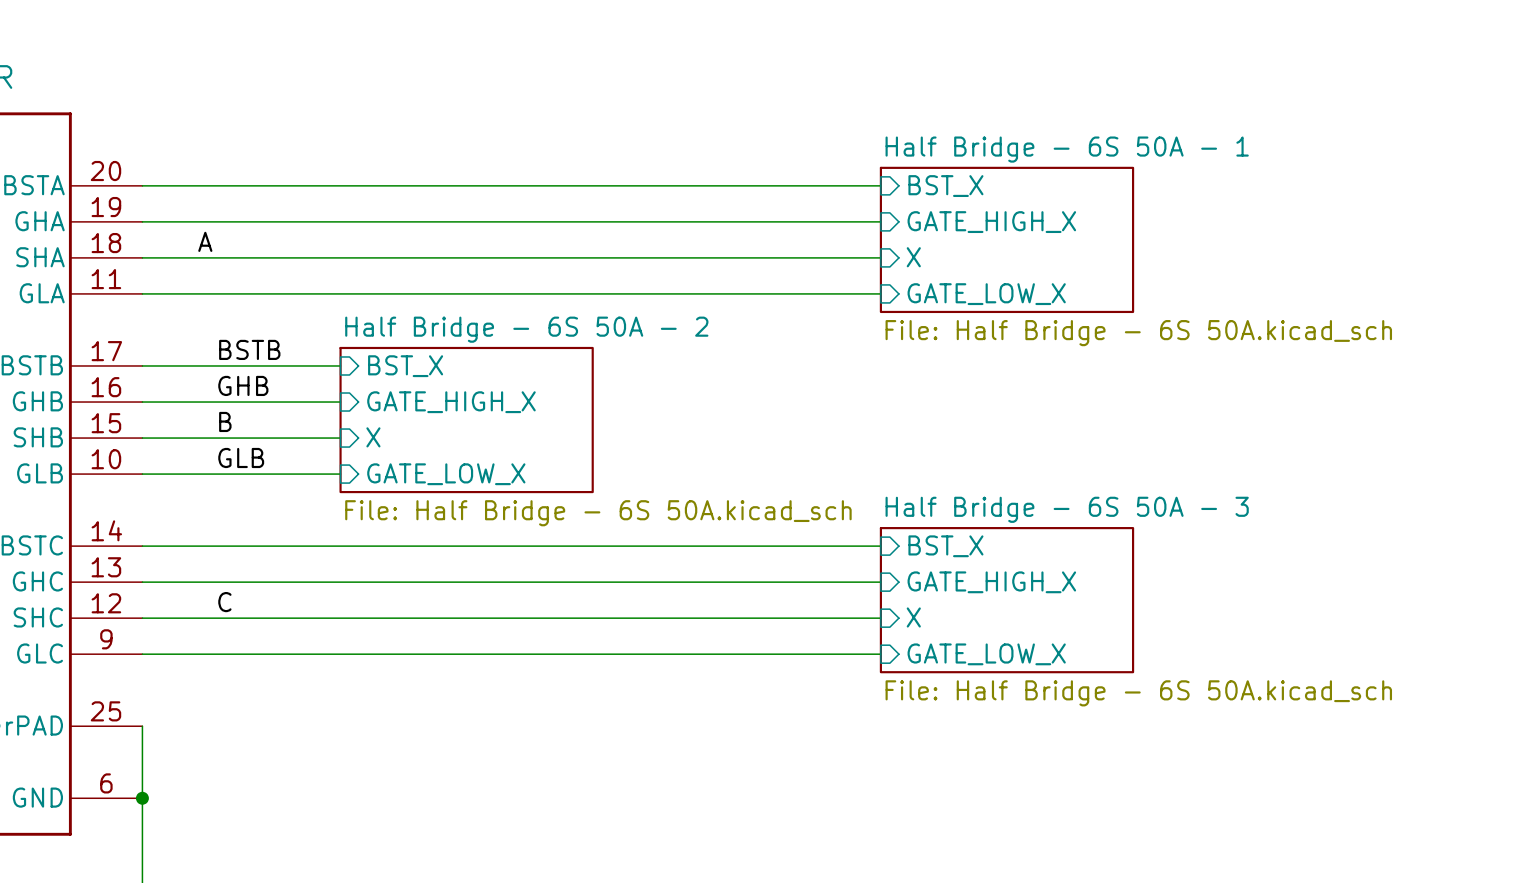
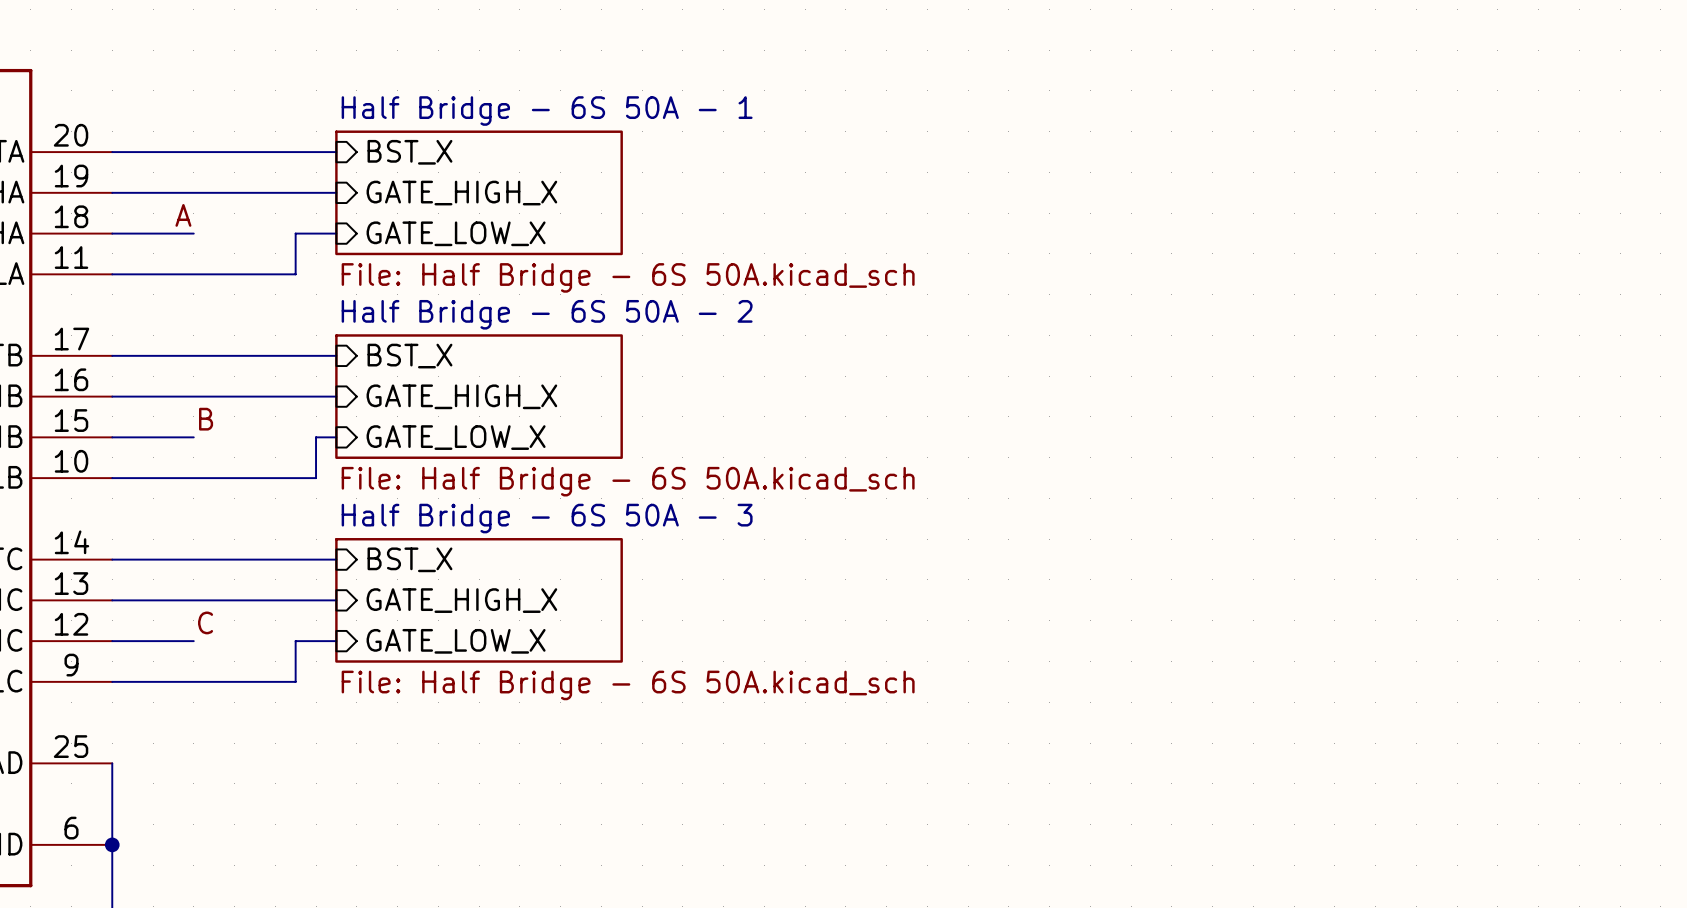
sheet Half Bridge - 6S 50A - 1 shape: [879, 166, 1135, 314] -> [335, 130, 623, 256]
wire: (340, 185) (880, 185) -> none
sheet pin: none -> BST_X (409, 152)
sheet pin: BST_X (945, 186) -> none
wire: (340, 221) (880, 221) -> none
sheet pin: none -> GATE_HIGH_X (461, 193)
sheet pin: GATE_HIGH_X (991, 222) -> none
wire: (214, 257) (304, 257) -> (295, 274) (295, 233)
wire: (340, 257) (880, 257) -> none
sheet pin: X (913, 257) -> none
sheet pin: none -> GATE_LOW_X (456, 233)
wire: (304, 293) (880, 293) -> none
sheet pin: GATE_LOW_X (986, 294) -> none
sheet Half Bridge - 6S 50A - 2 shape: [339, 346, 594, 494] -> [335, 334, 623, 459]
label: BSTB (249, 349) -> none
label: GHB (243, 385) -> none
sheet pin: X (373, 437) -> GATE_LOW_X (456, 437)
wire: (214, 438) (322, 438) -> none
label: GLB (241, 457) -> none
wire: (322, 474) (340, 474) -> (316, 478) (316, 437)
sheet pin: GATE_LOW_X (446, 474) -> none
sheet Half Bridge - 6S 50A - 3 shape: [879, 527, 1135, 674] -> [335, 538, 623, 663]
wire: (340, 546) (880, 546) -> none
sheet pin: none -> BST_X (409, 559)
sheet pin: BST_X (945, 546) -> none
wire: (340, 582) (880, 582) -> none
sheet pin: none -> GATE_HIGH_X (461, 600)
sheet pin: GATE_HIGH_X (991, 582) -> none
sheet pin: X (913, 617) -> none
wire: (214, 618) (304, 618) -> (295, 681) (295, 641)
wire: (340, 618) (880, 618) -> none
sheet pin: none -> GATE_LOW_X (456, 641)
wire: (304, 654) (880, 654) -> none
sheet pin: GATE_LOW_X (986, 654) -> none

